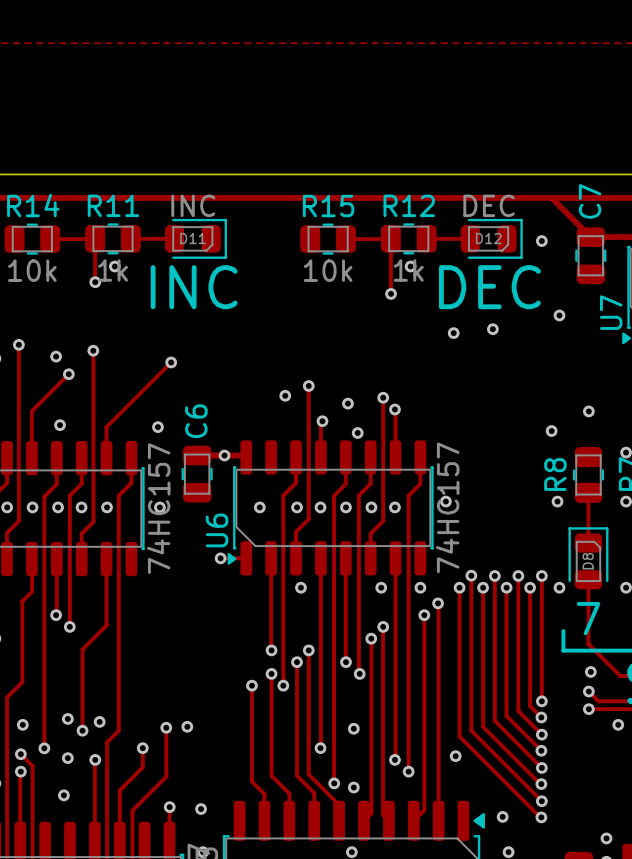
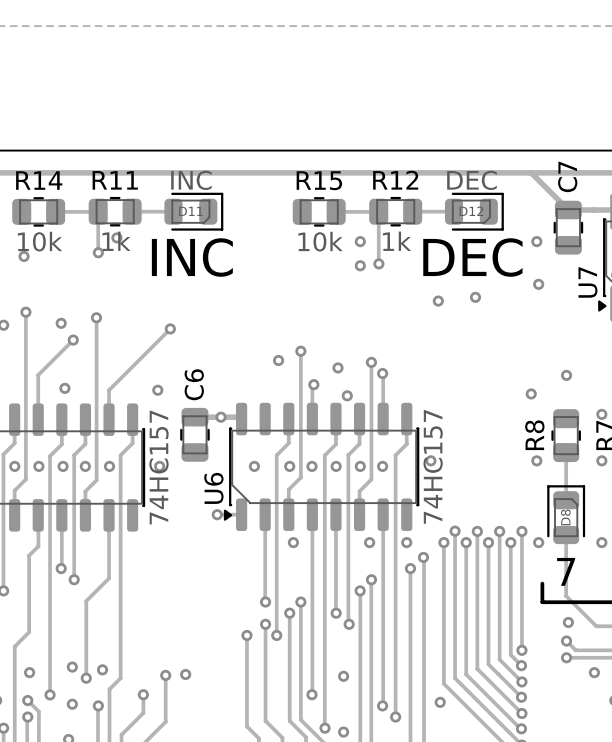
via position: (541, 241) -> (536, 241)
via: (410, 266) -> none
via: none -> (360, 241)
via: none -> (24, 256)
via: none -> (360, 265)

